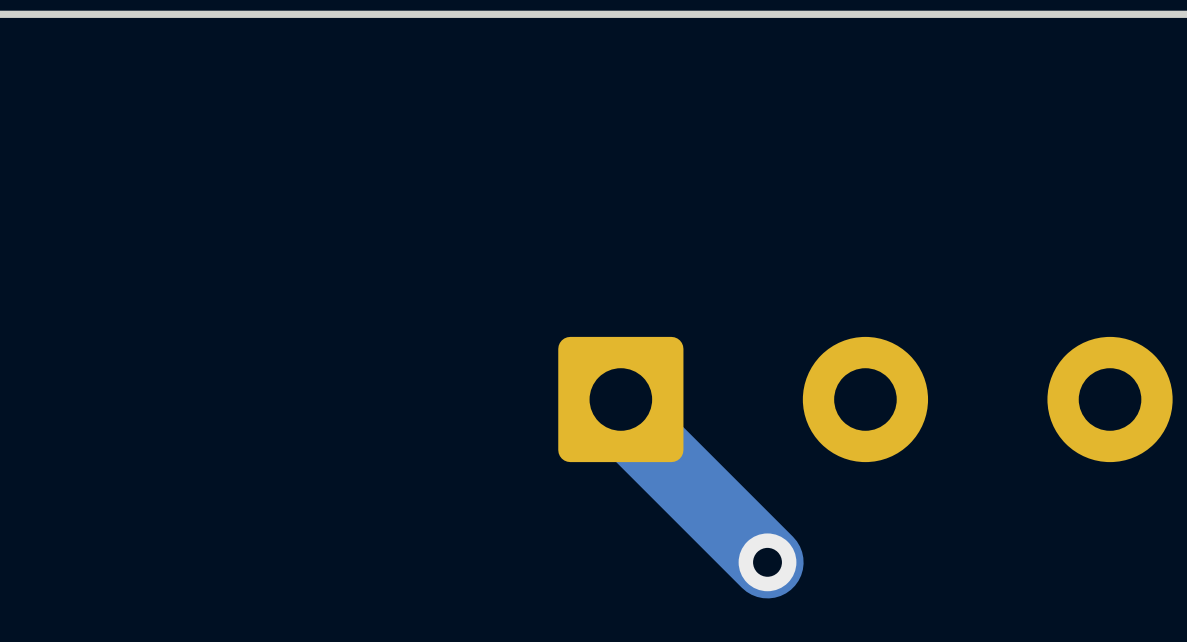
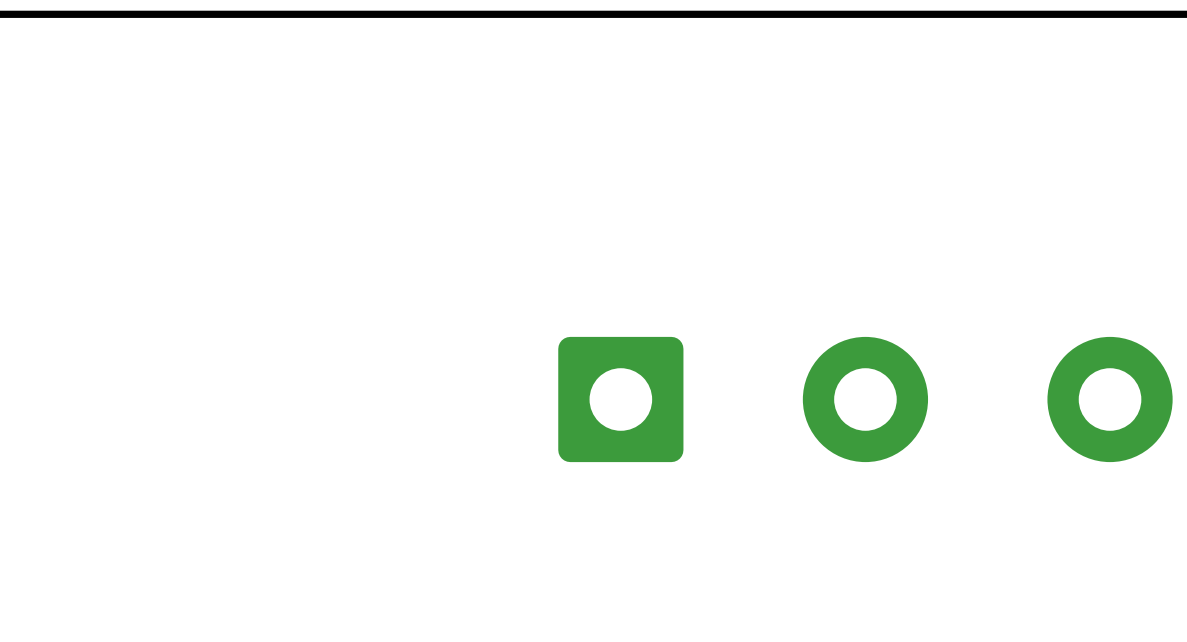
track: (620, 399) (620, 415) (767, 562) -> none
via: (767, 562) -> none

